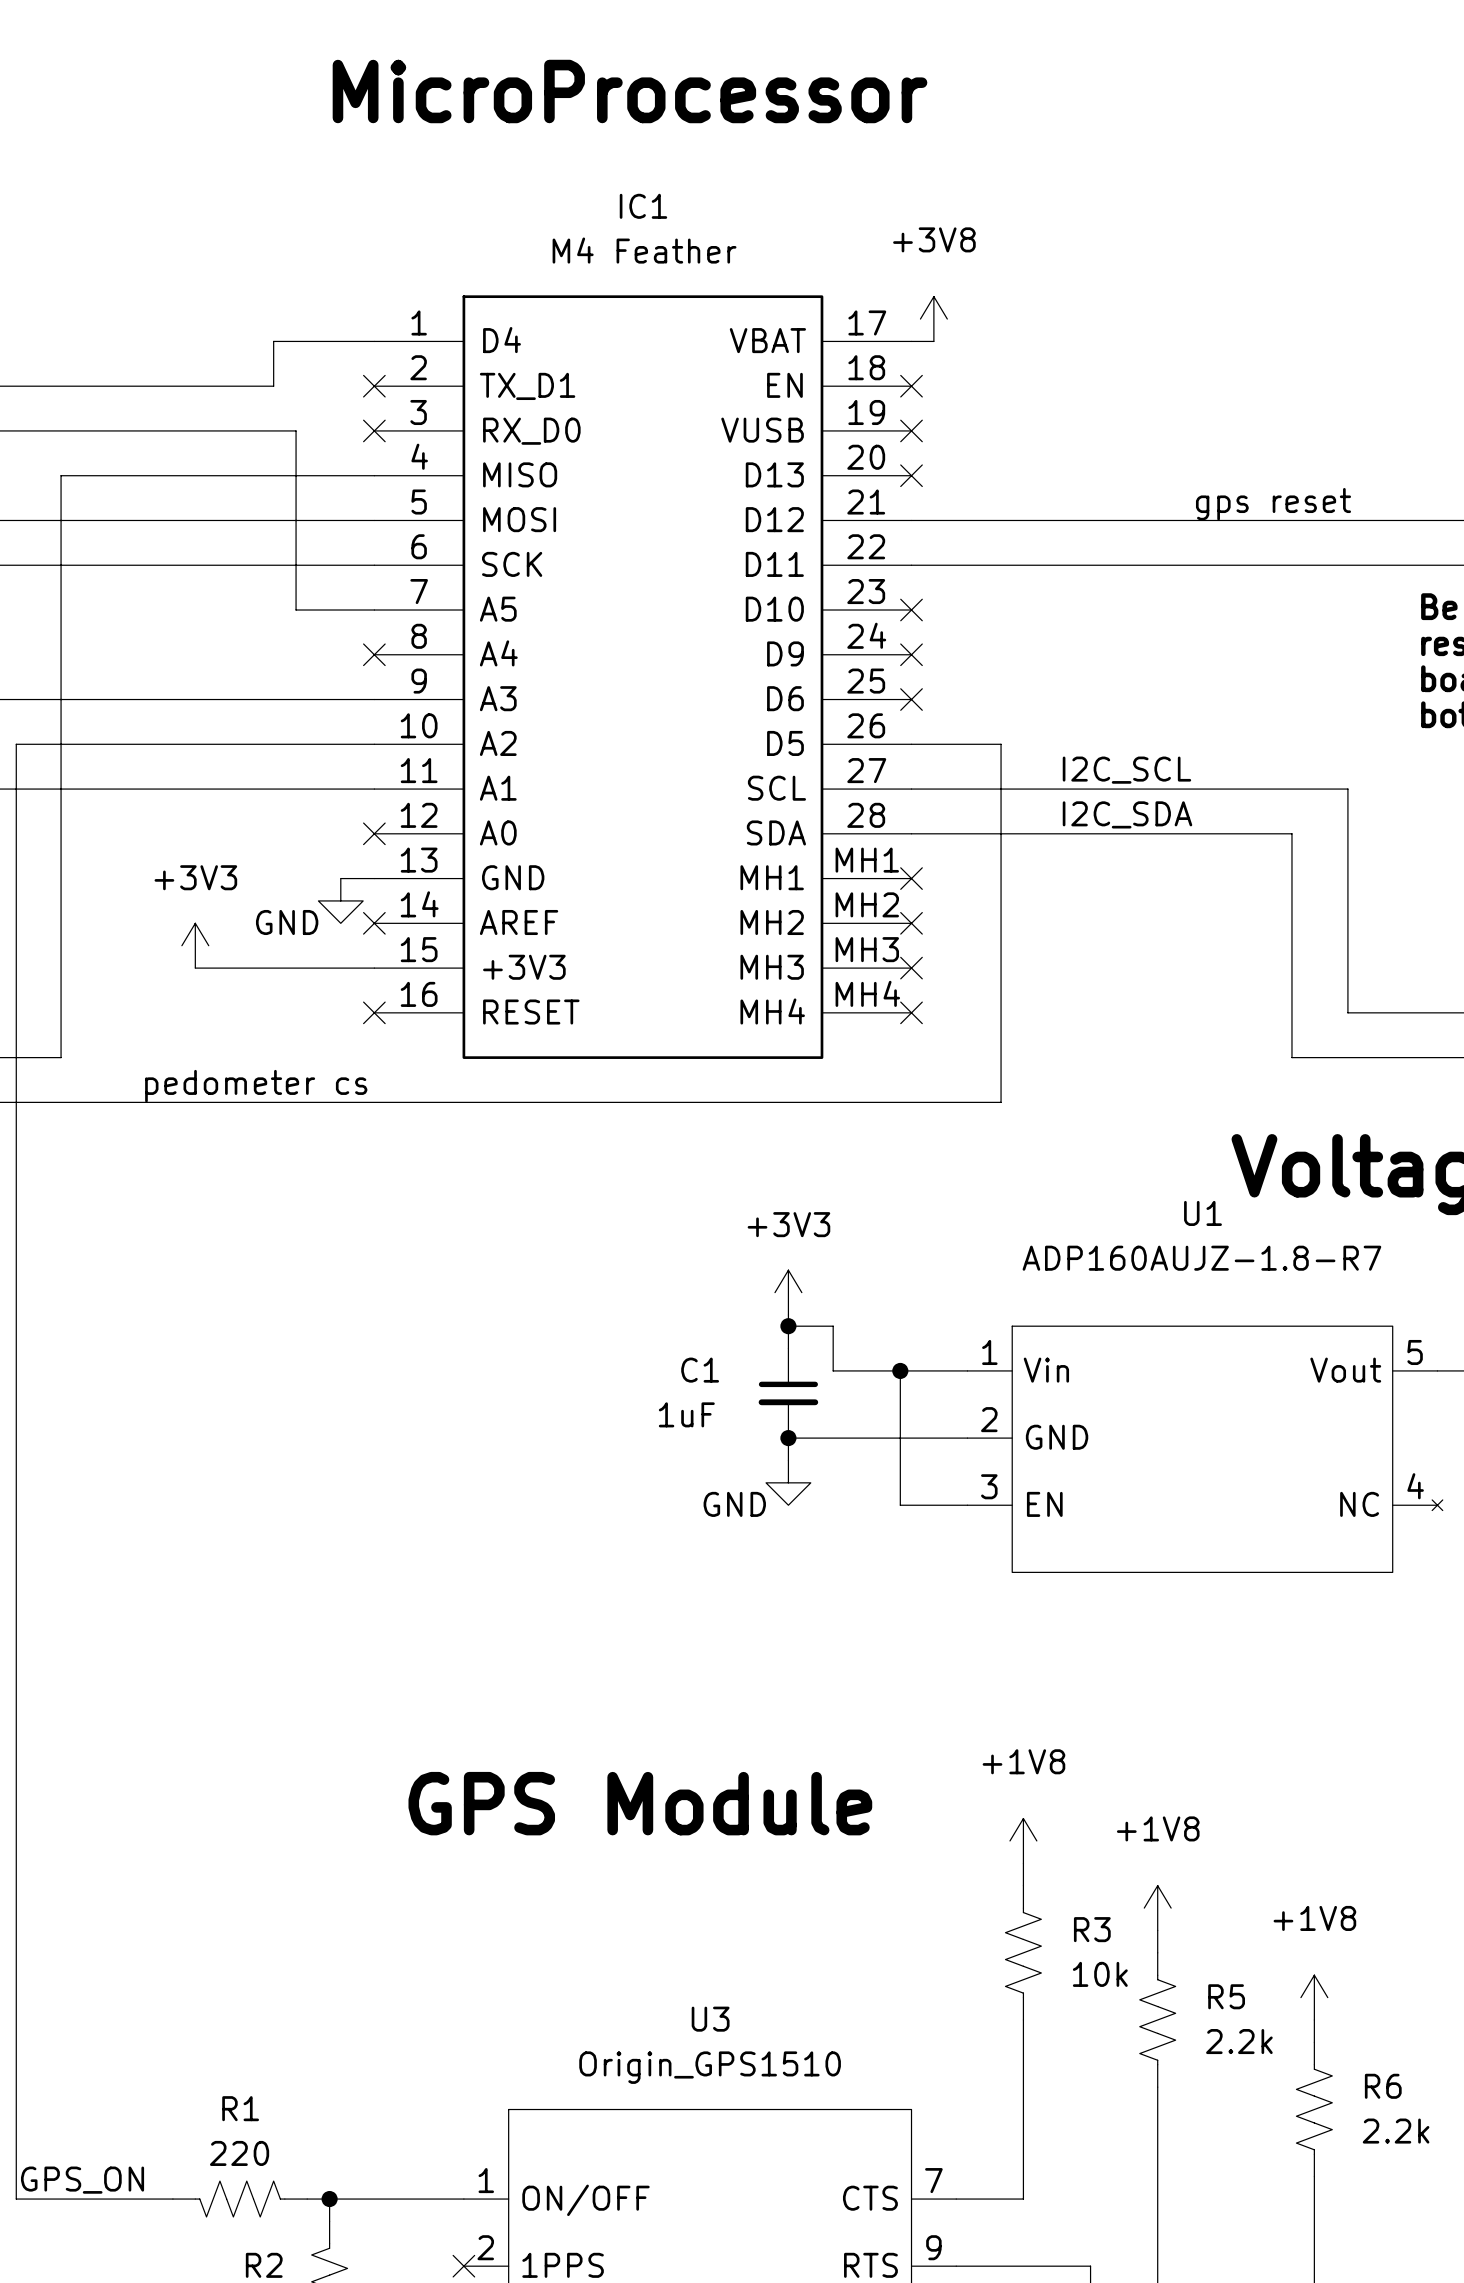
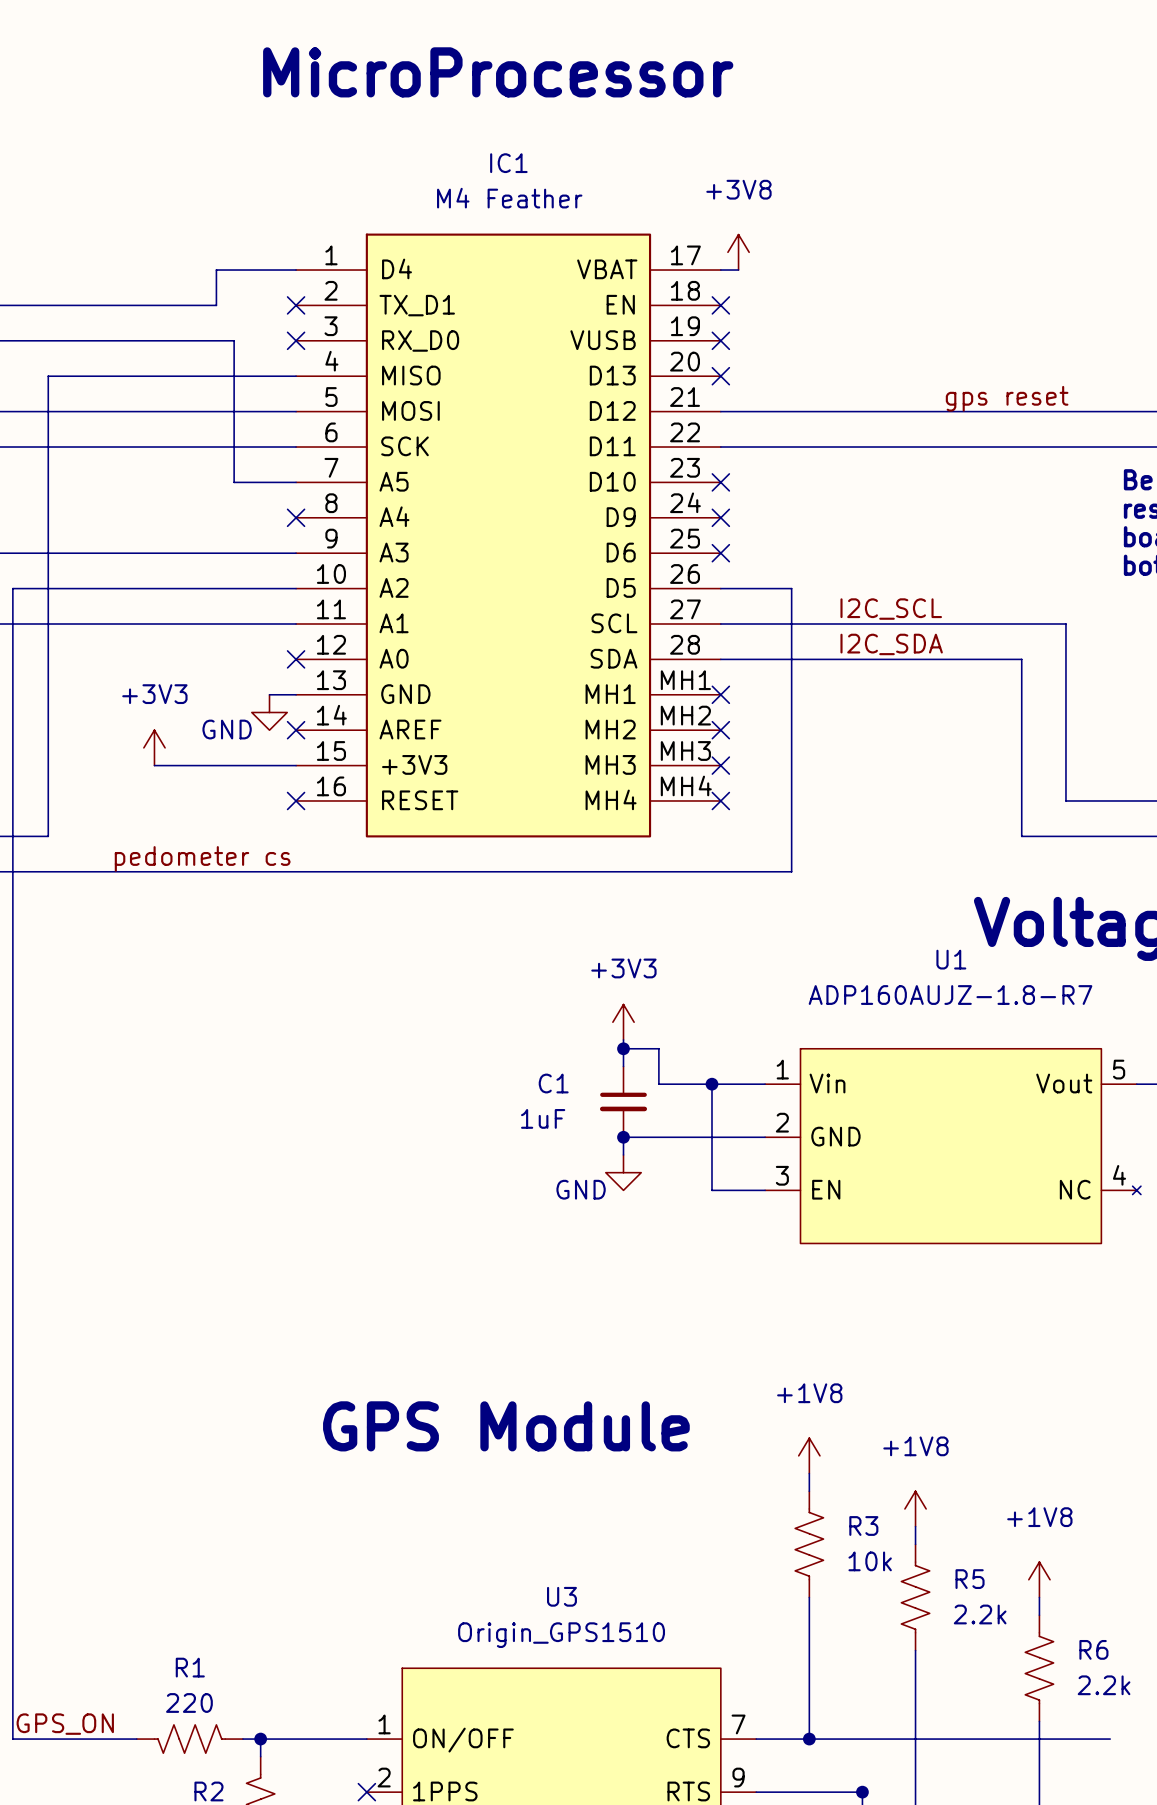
wire: none -> (809, 1739) (1110, 1739)
junction: none -> (809, 1739)
junction: none -> (862, 1792)

